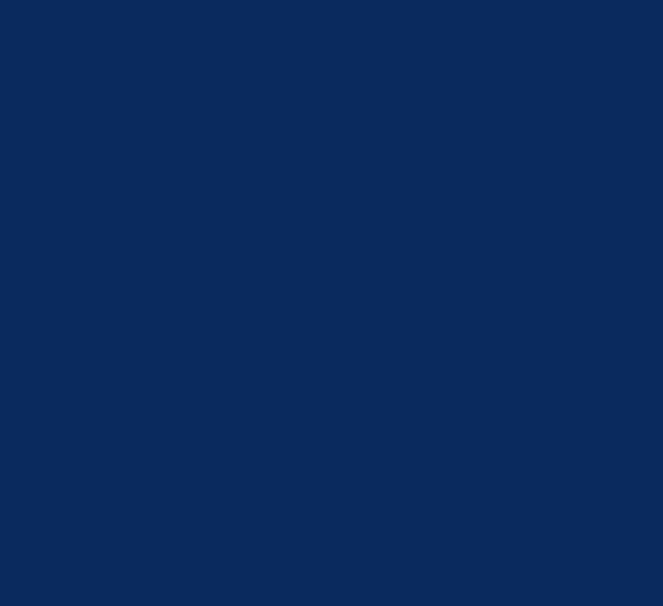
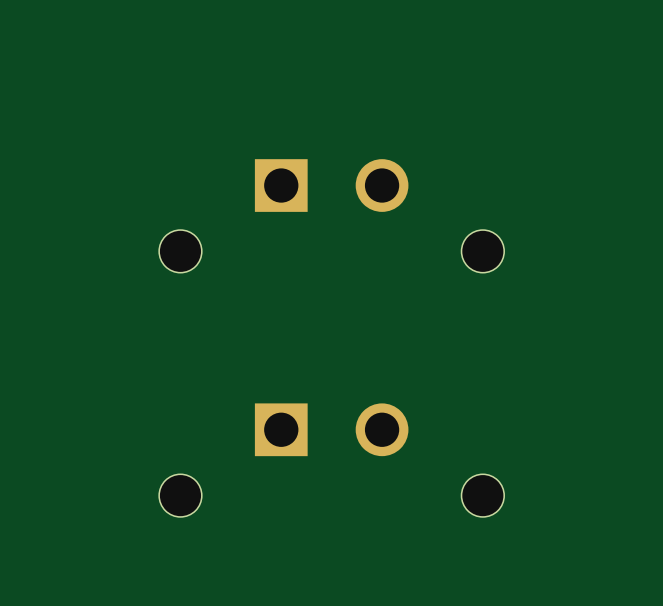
part: none -> (331, 215)
part: none -> (331, 460)

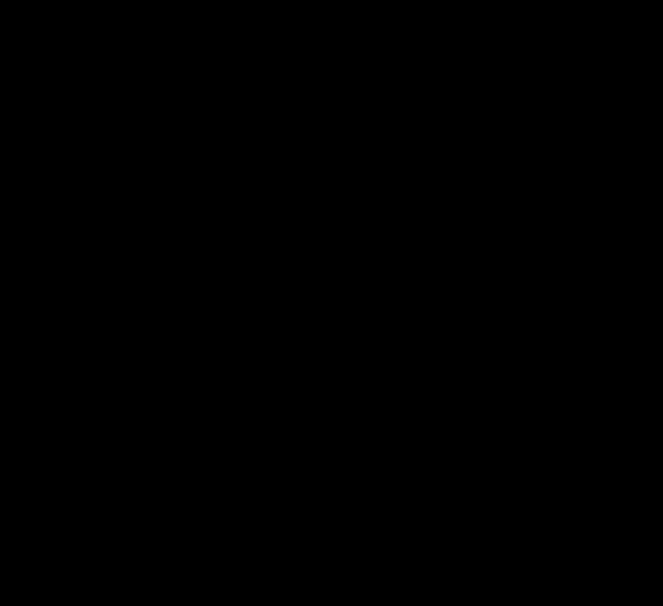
part: (331, 215) -> none
part: (331, 460) -> none

